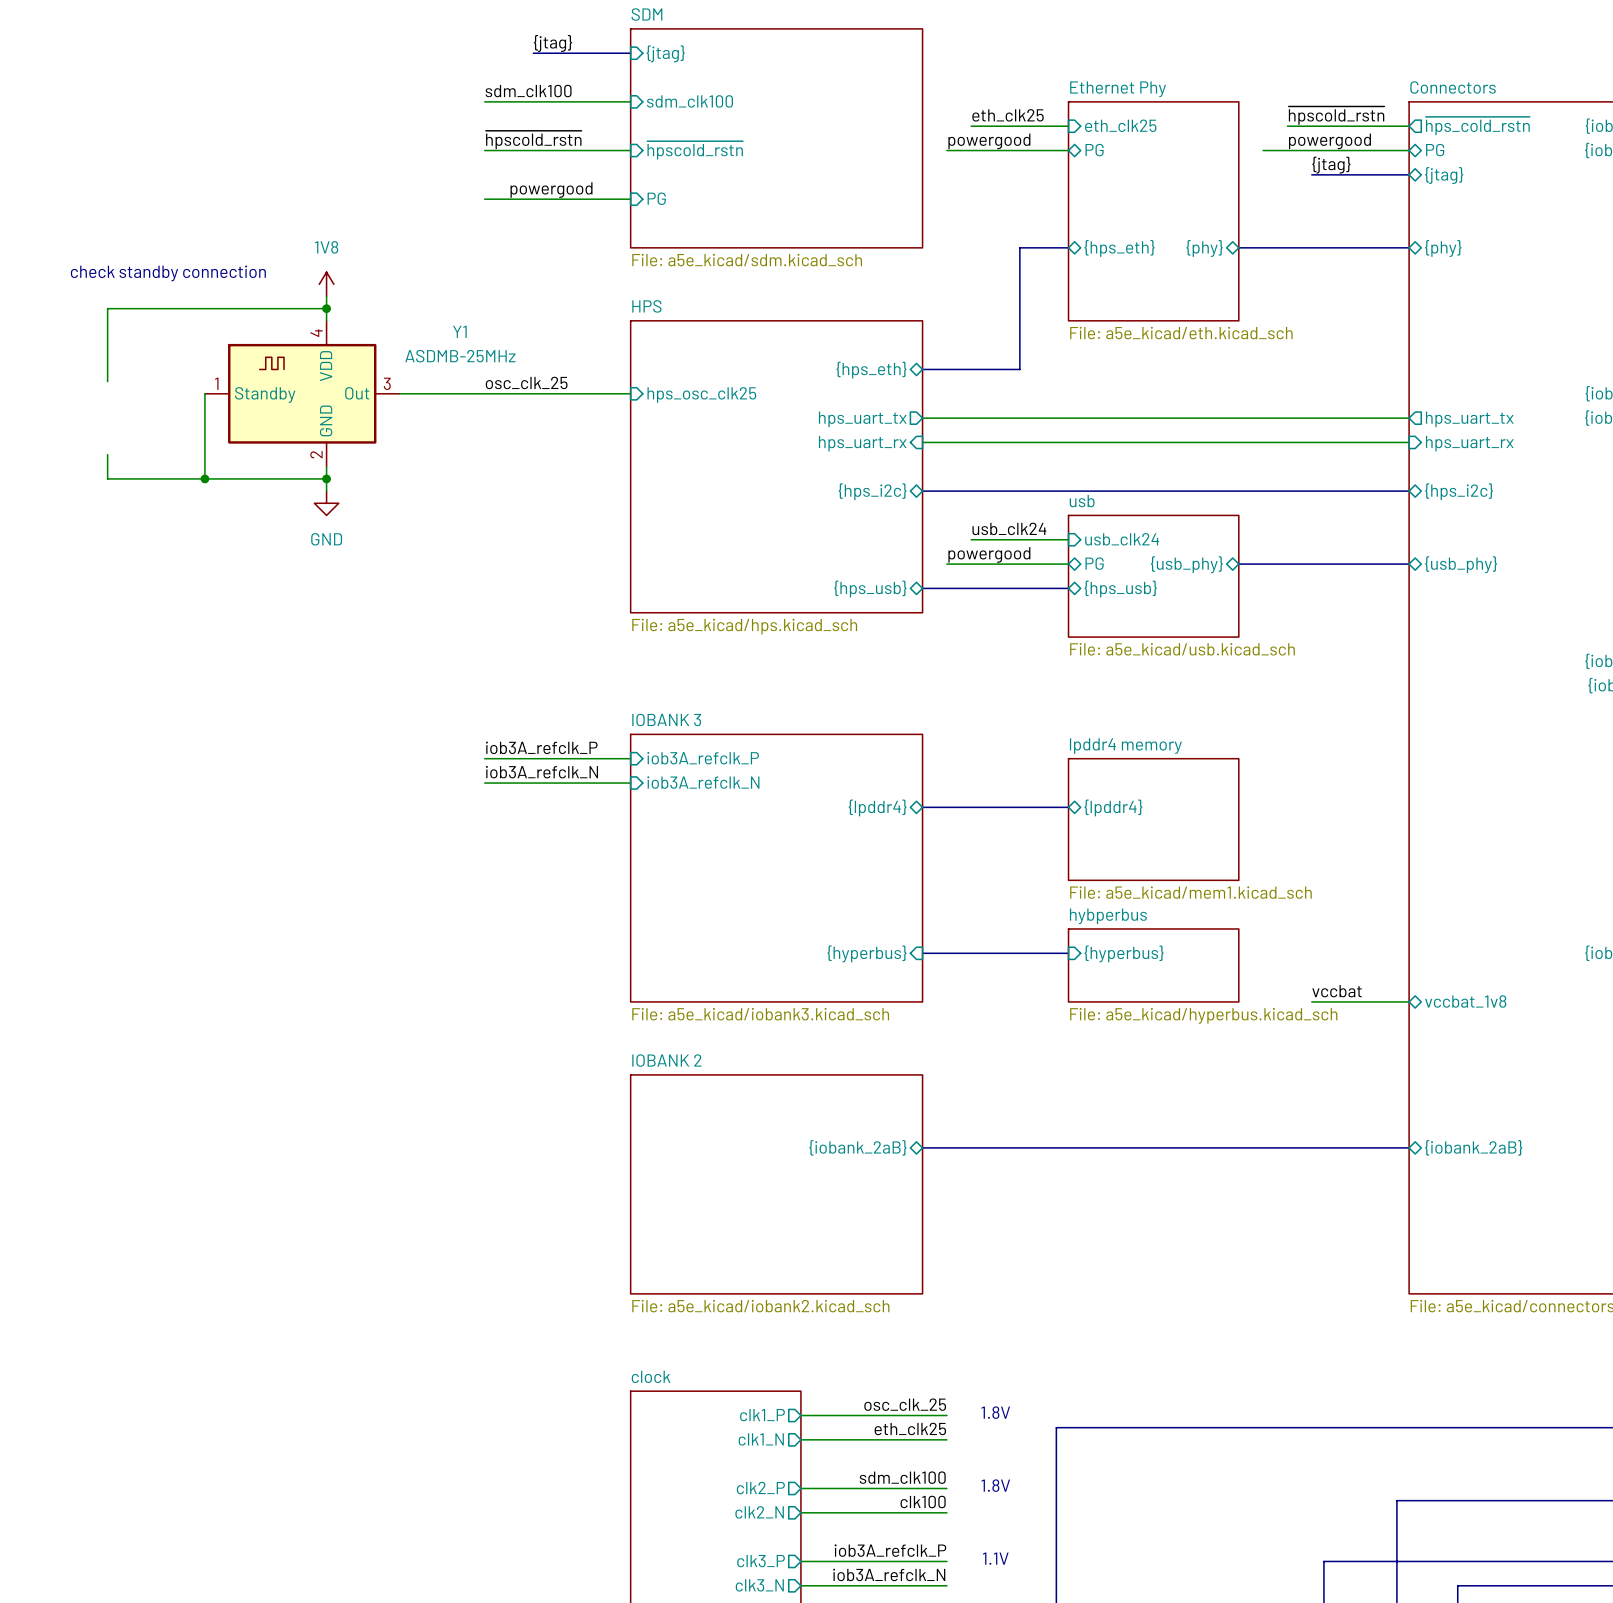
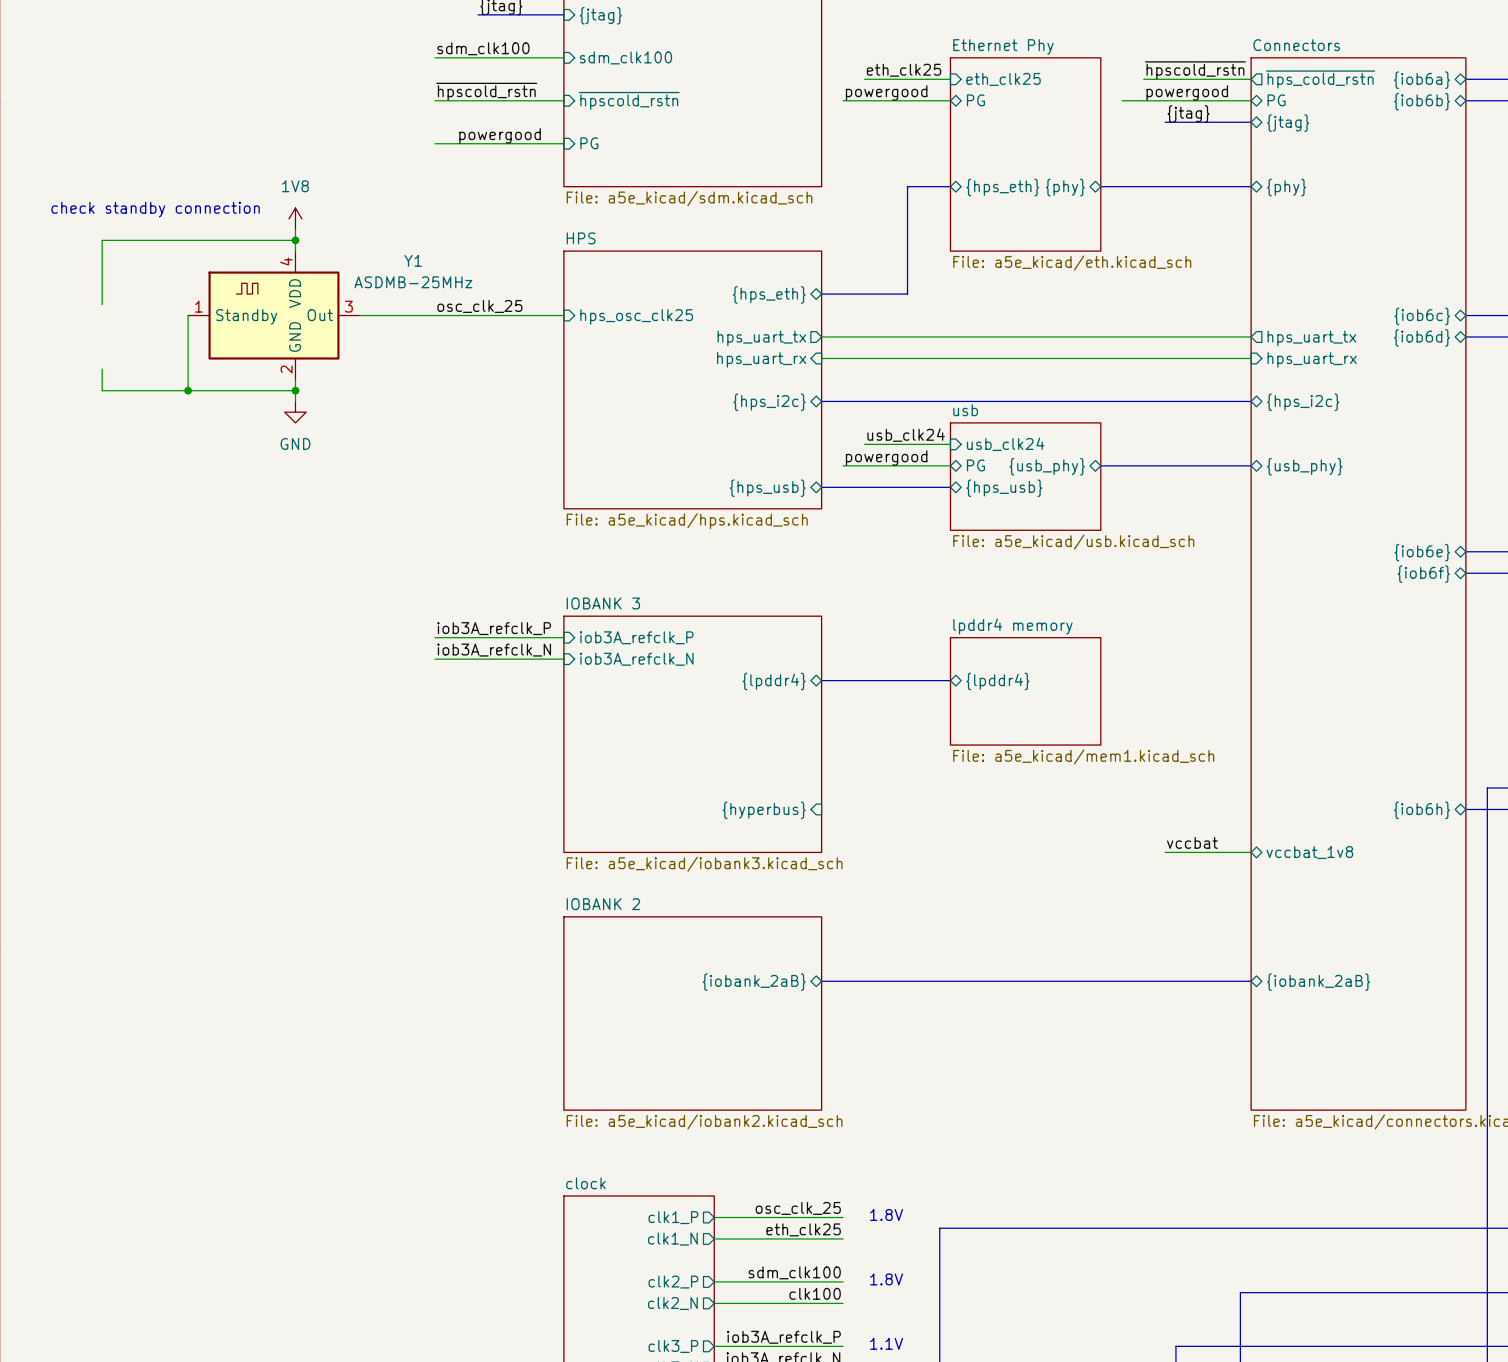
bus: (922, 953) (1068, 953) -> none
sheet pin: {hyperbus} (1124, 953) -> none
sheet hybperbus: File: a5e_kicad/hyperbus.kicad_sch (1153, 965) -> none

